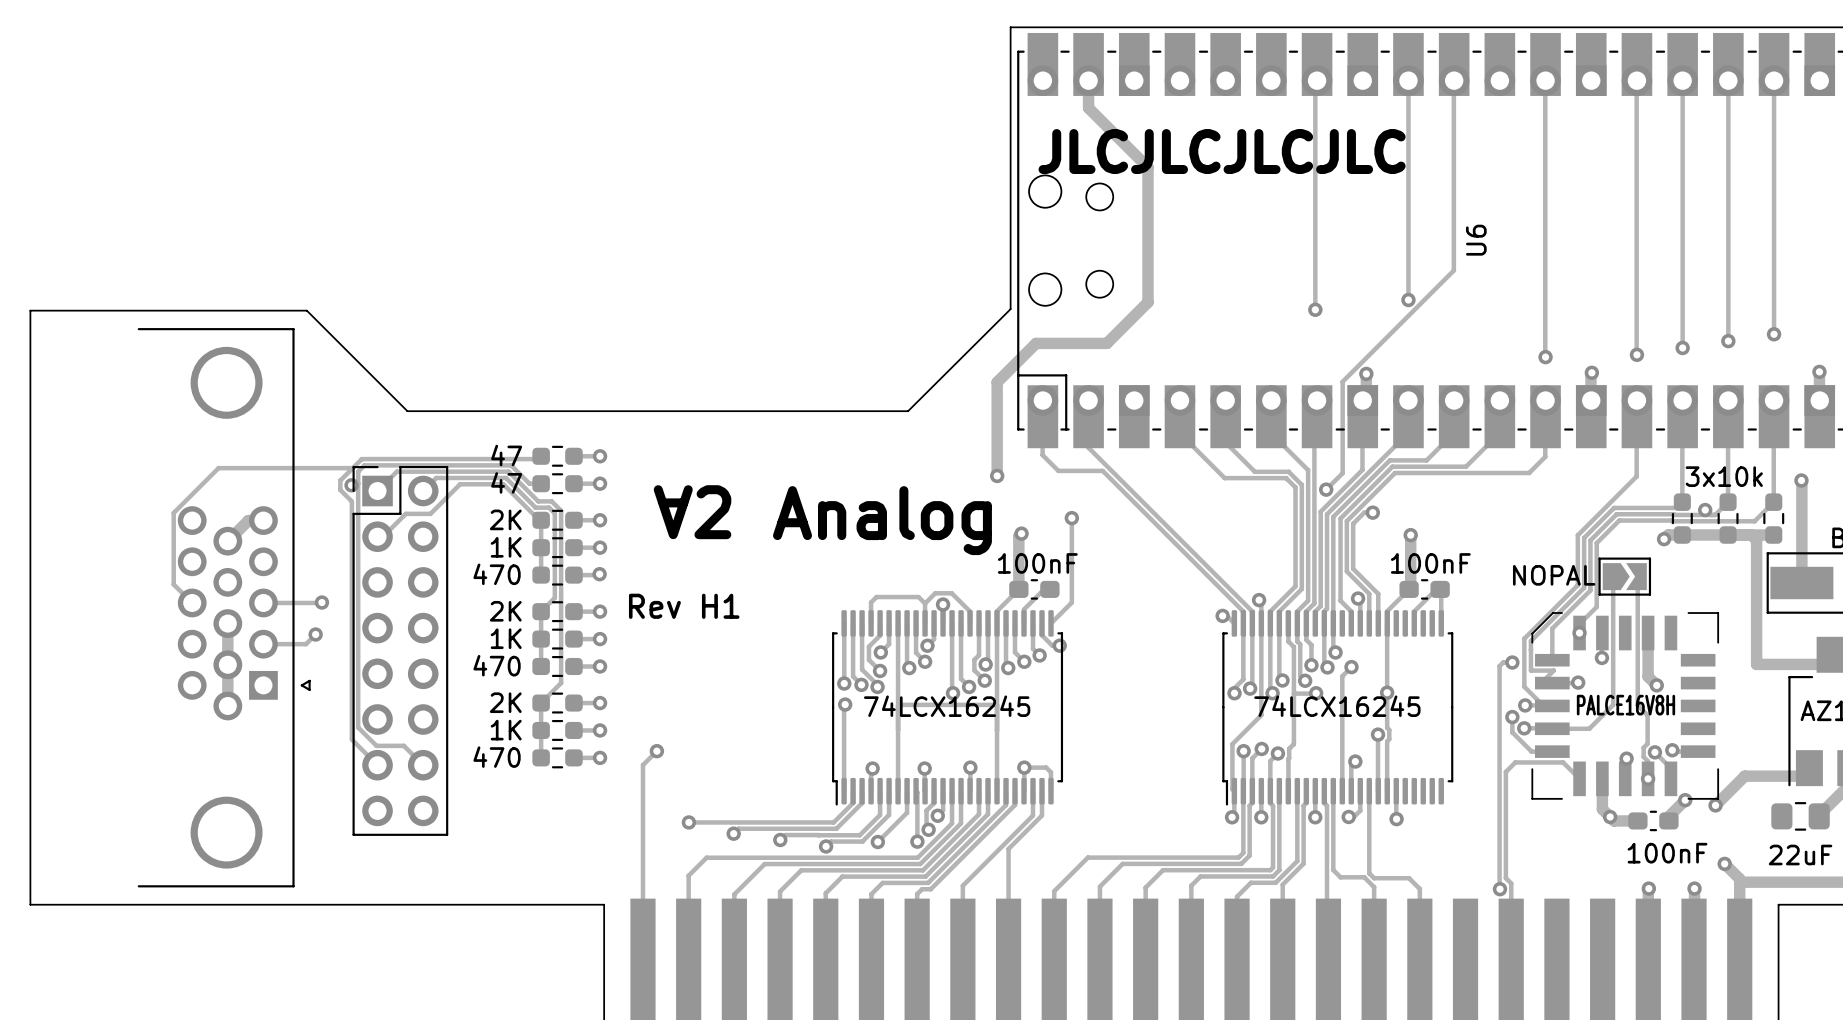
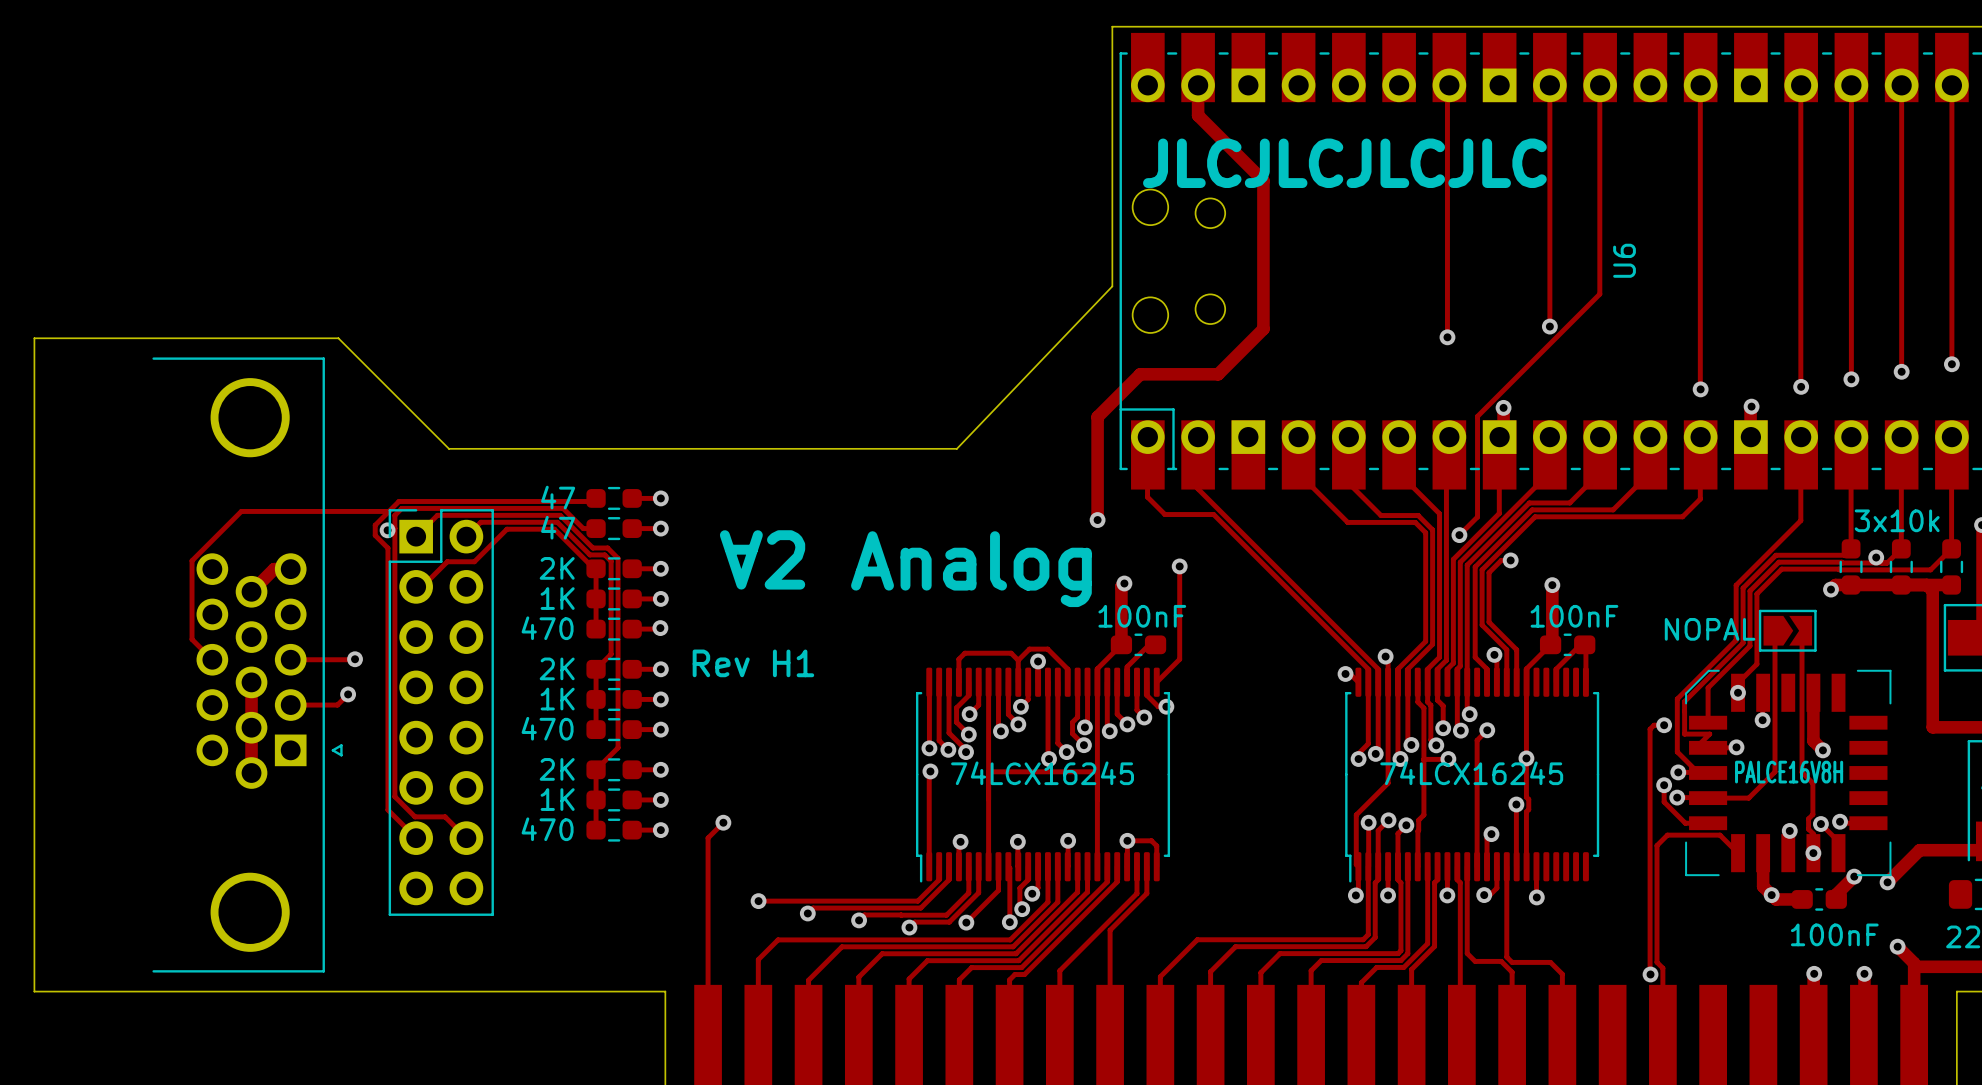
board edge: (1010, 263) (1010, 309) (908, 411) (869, 411) -> (1112, 286) (956, 448)

